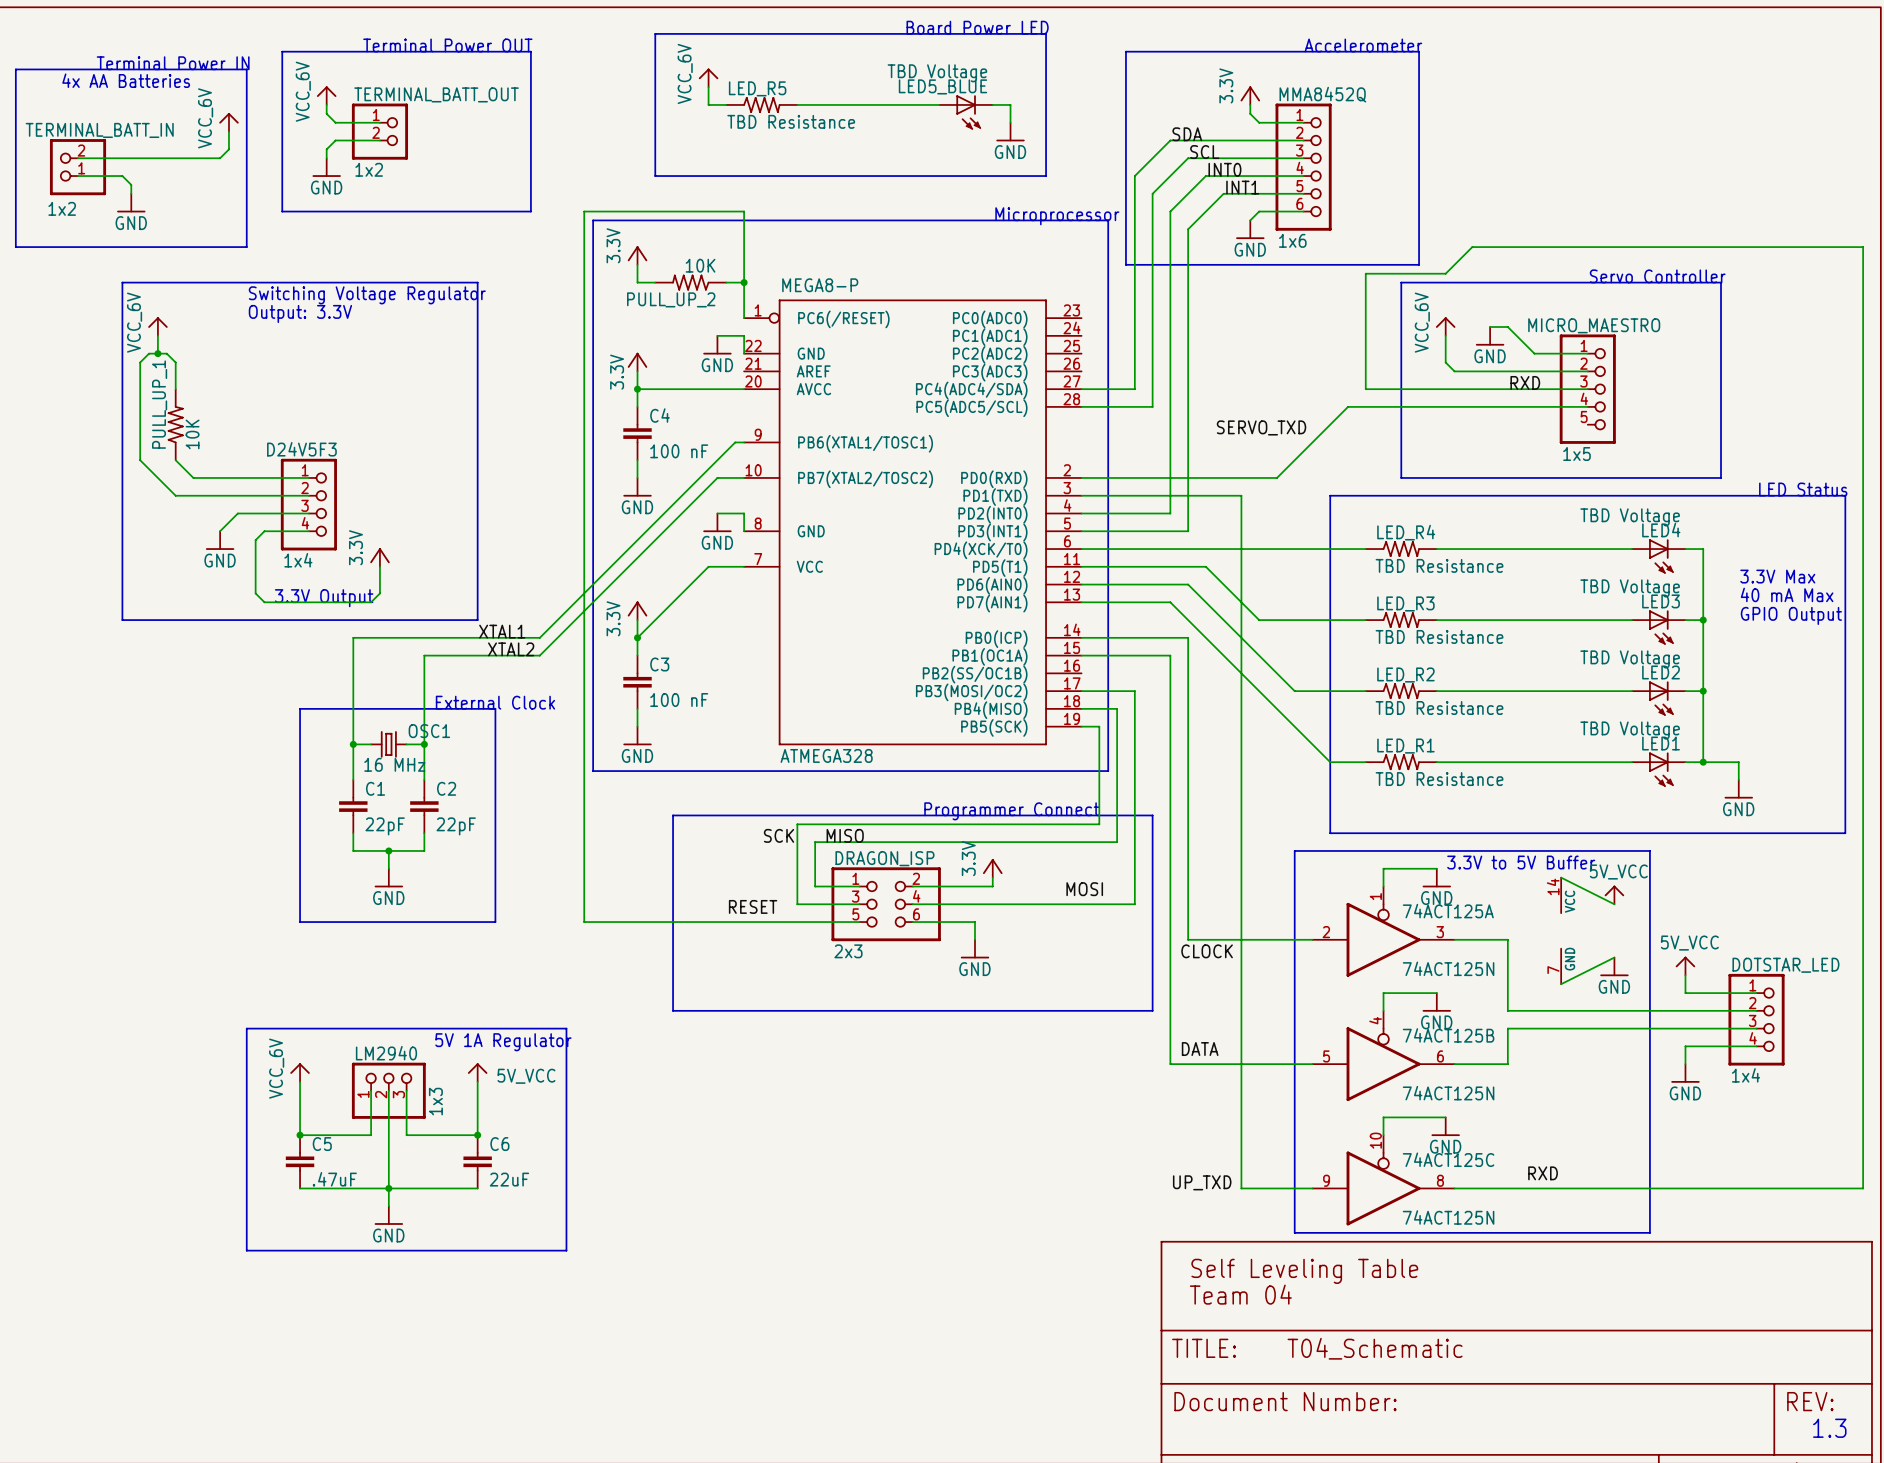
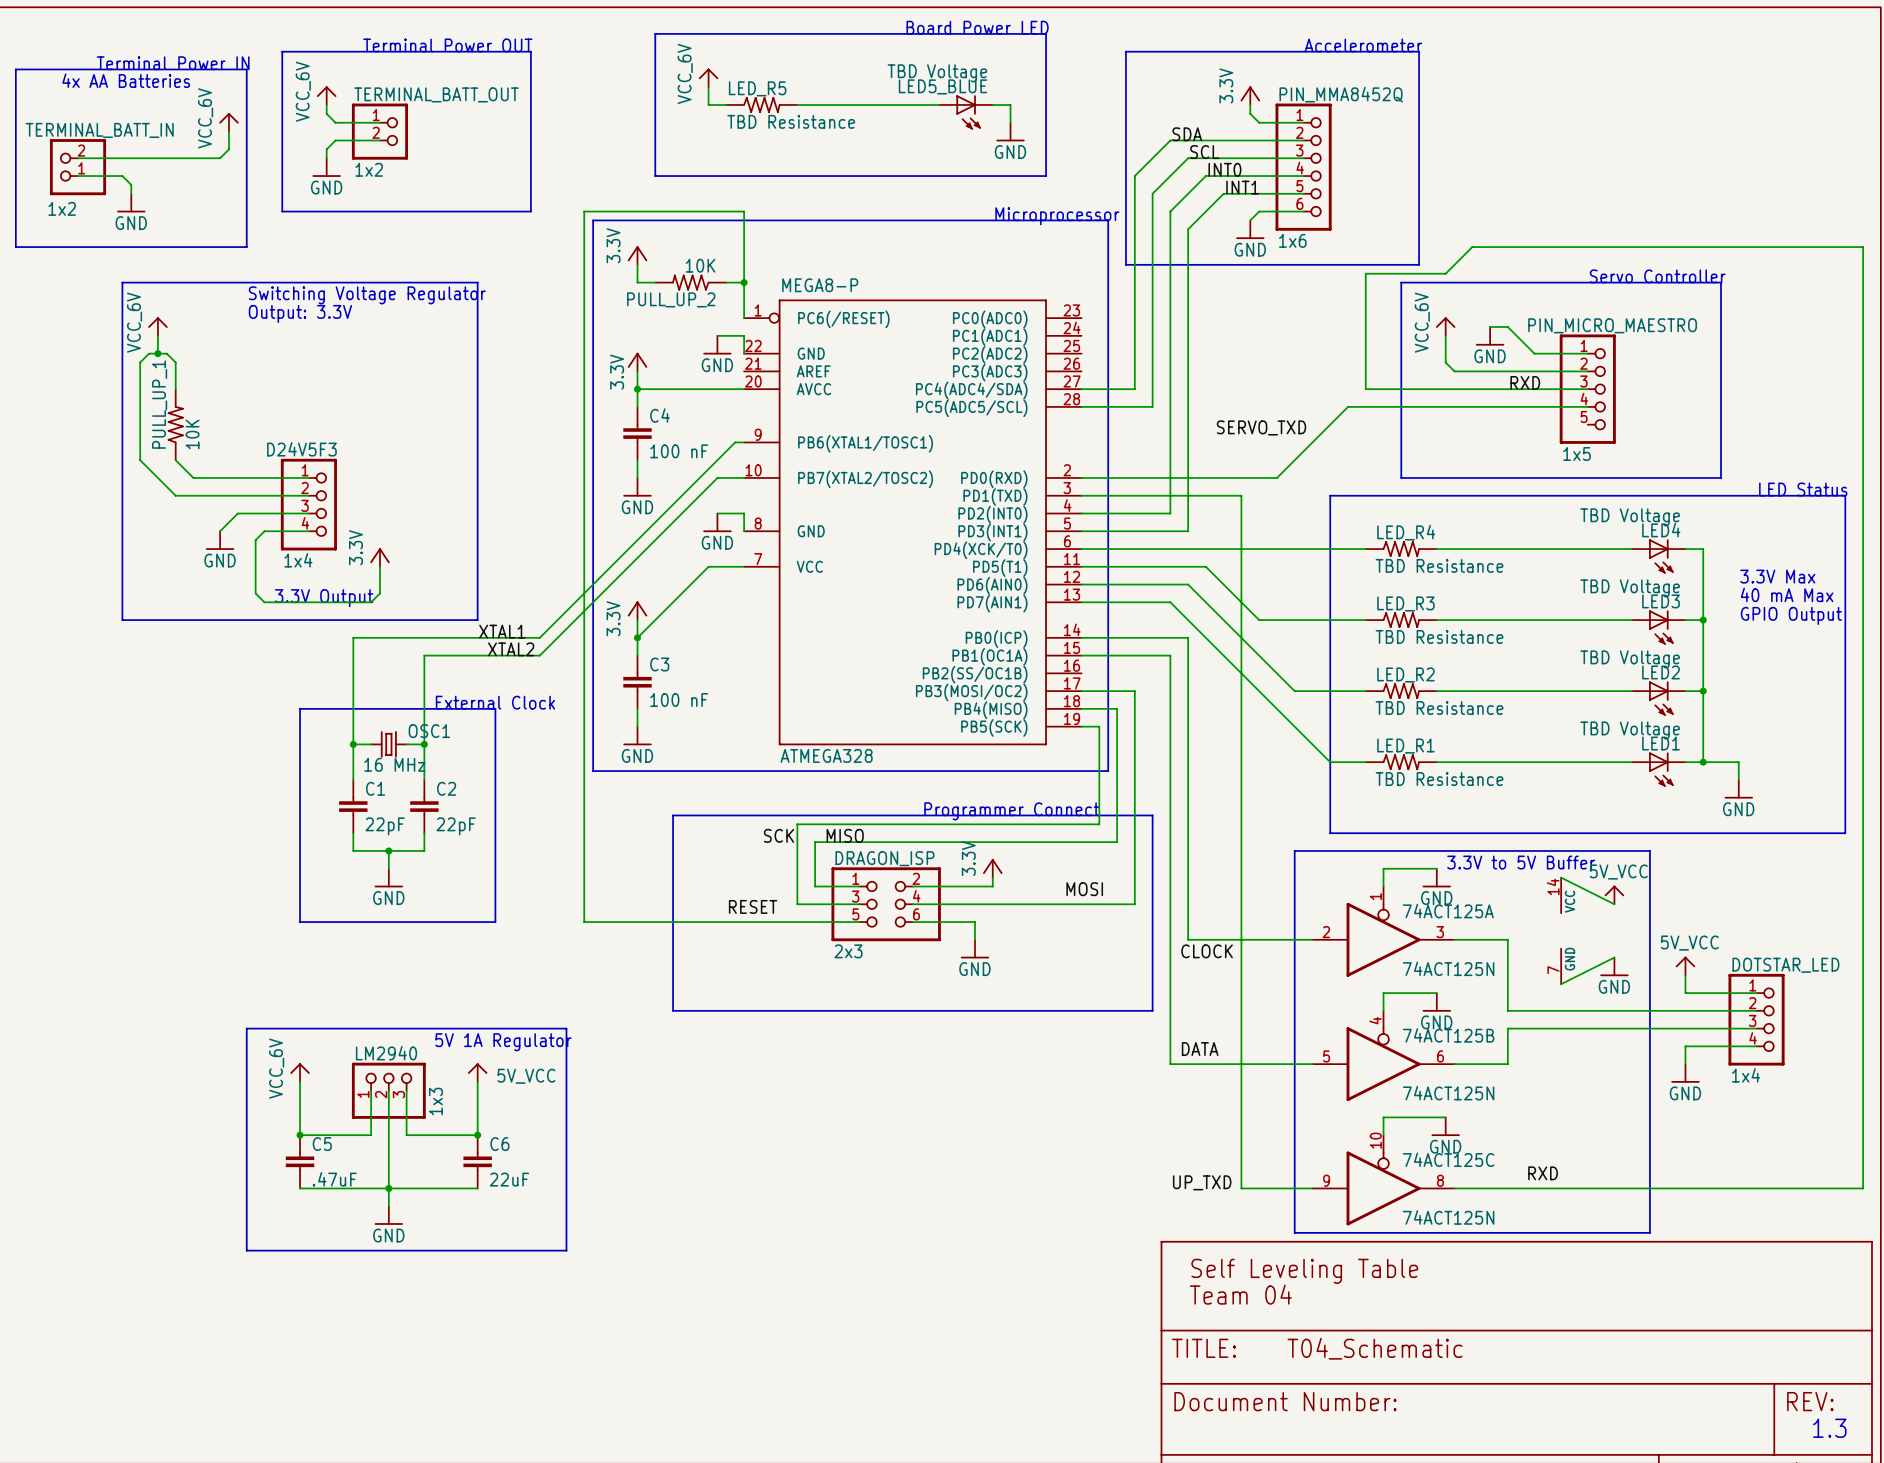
MMA8452Q name: MMA8452Q (1322, 94) -> PIN_MMA8452Q (1341, 94)
MICRO_MAESTRO name: MICRO_MAESTRO (1594, 325) -> PIN_MICRO_MAESTRO (1612, 325)

